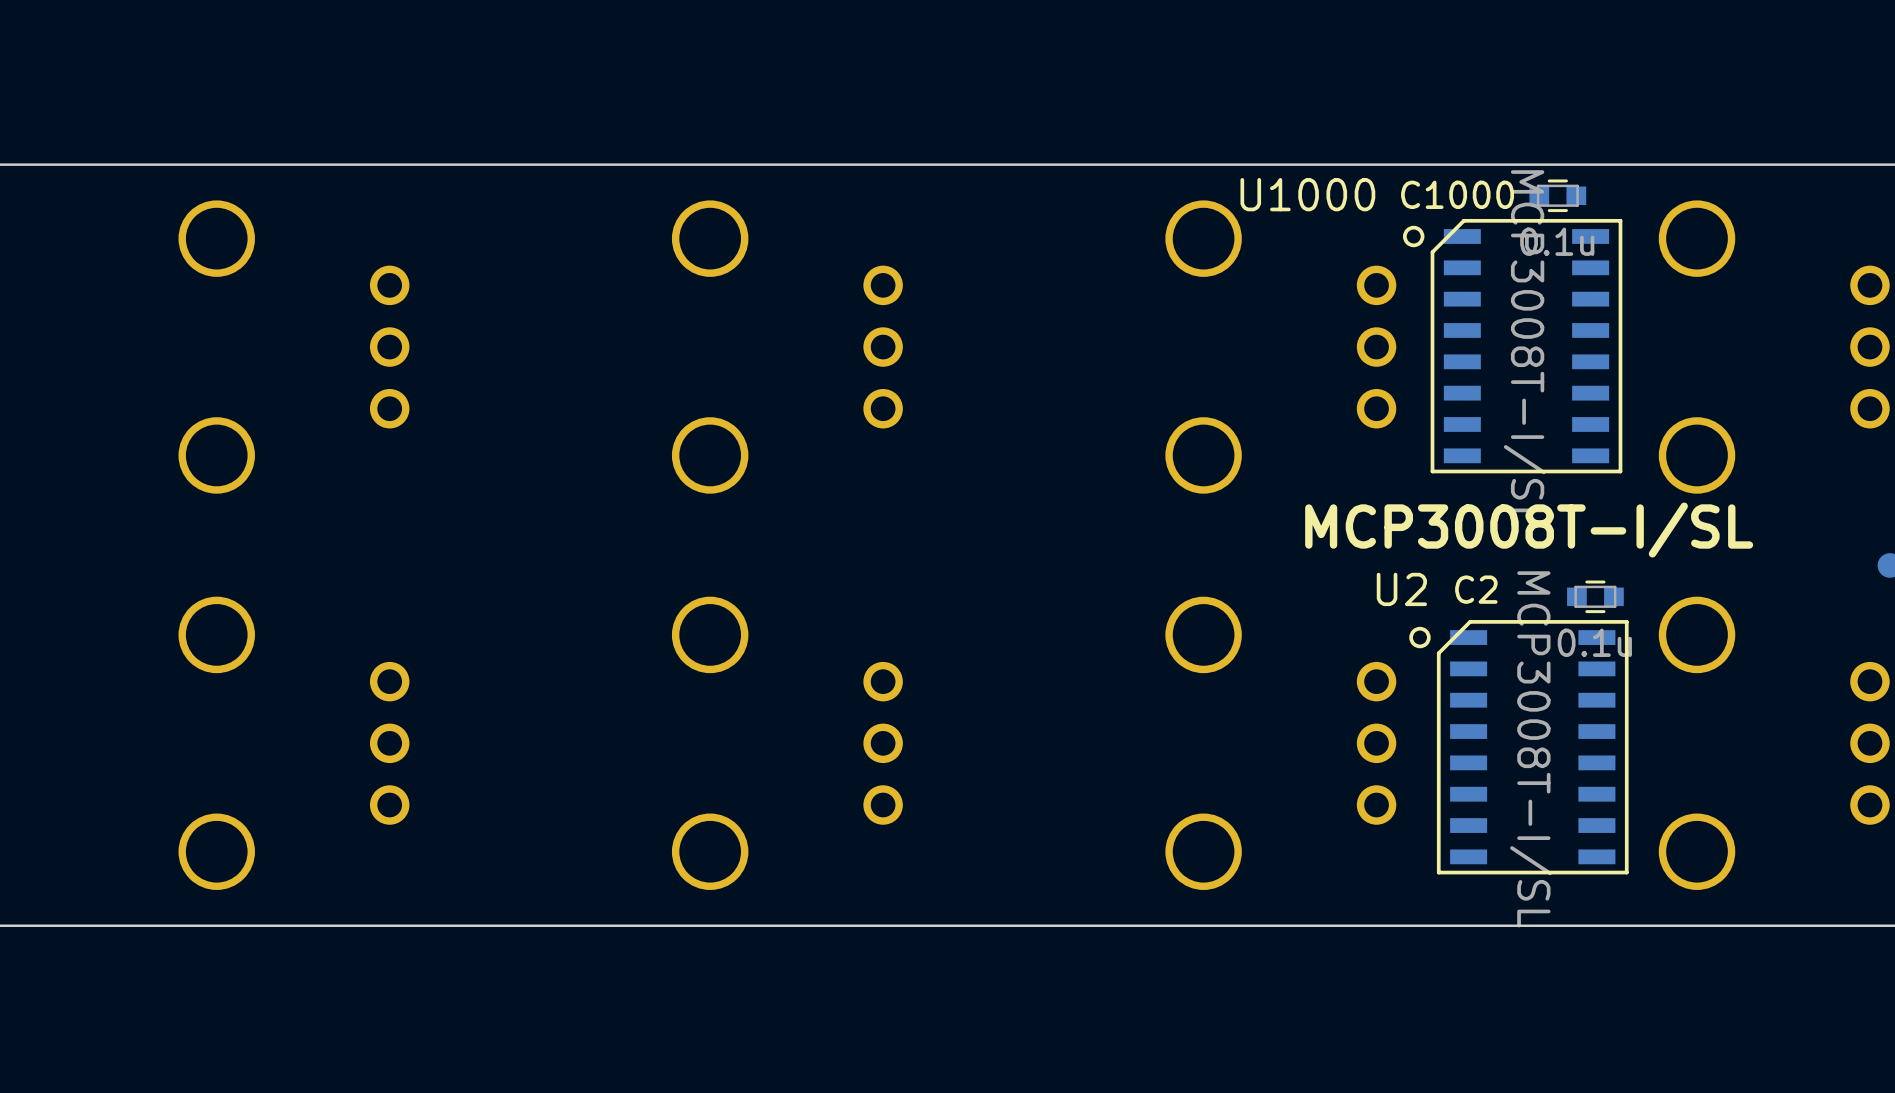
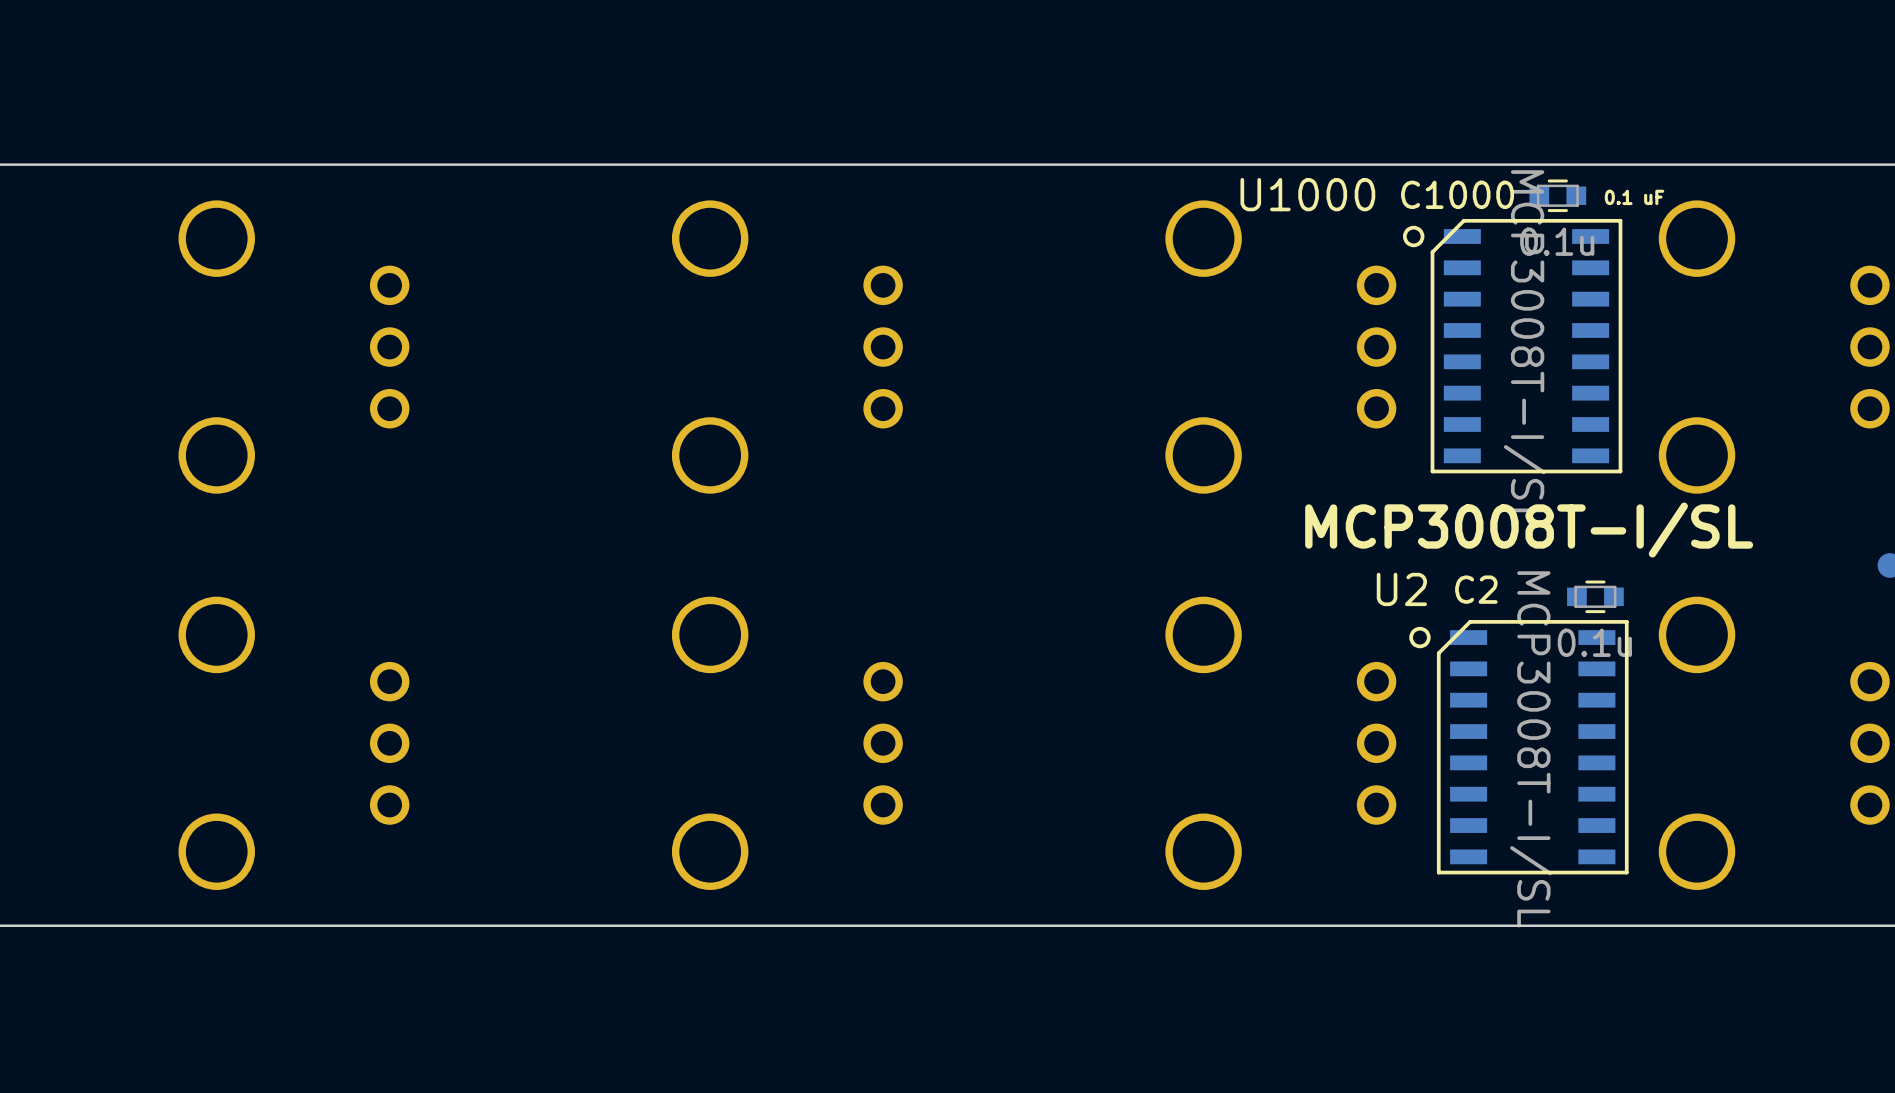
text: none -> 0.1 uF (1634, 197)

